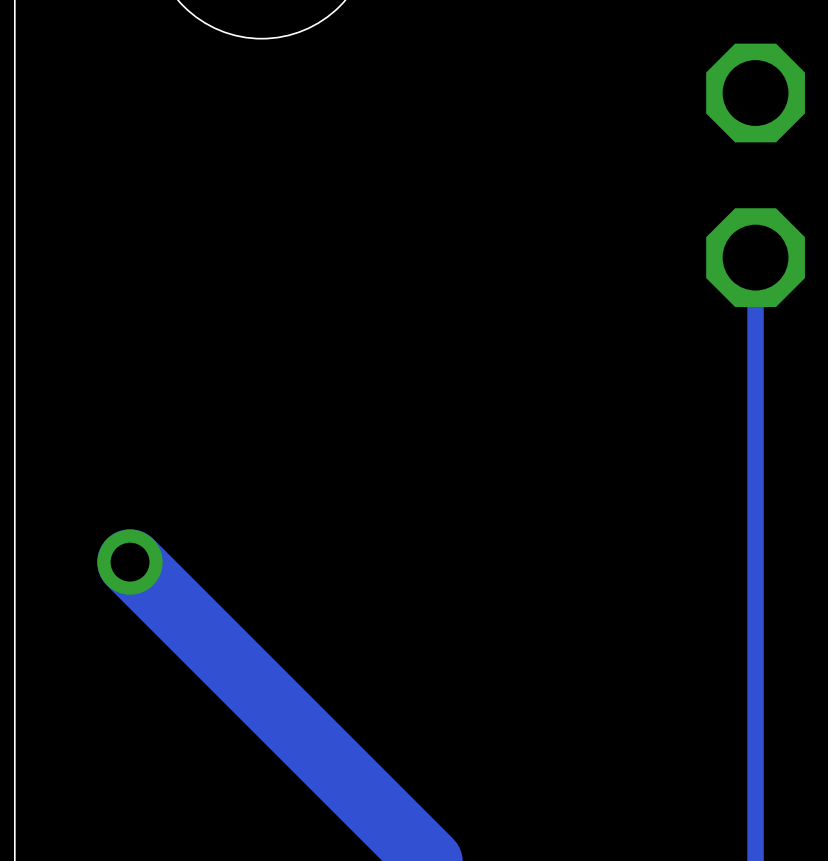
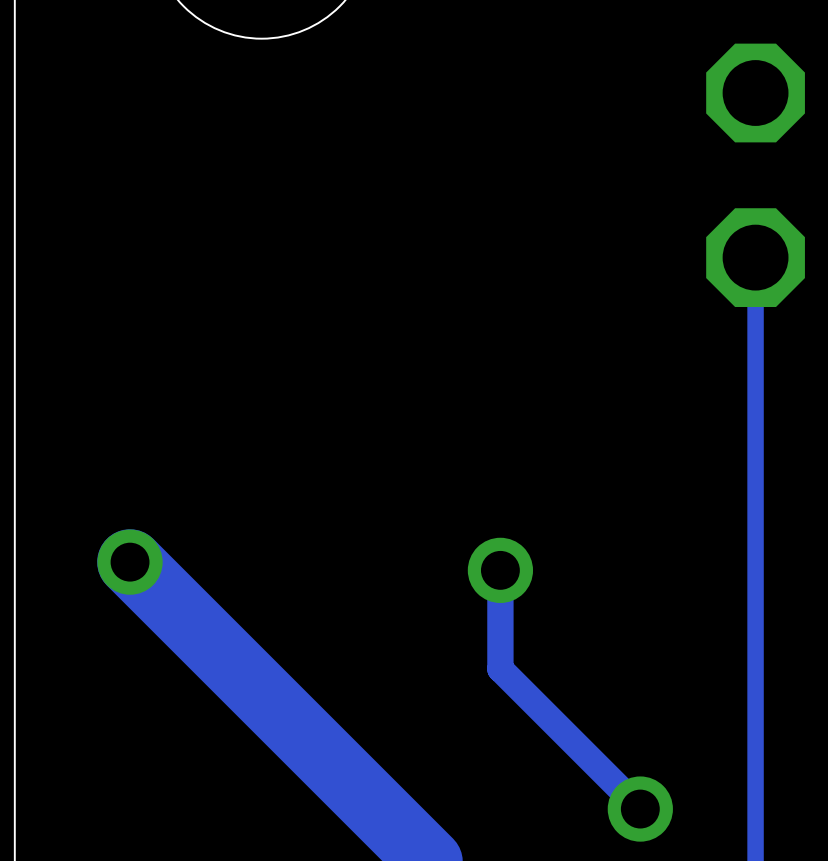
track: none -> (500, 570) (500, 669) (640, 809)
via: none -> (500, 570)
via: none -> (640, 809)

